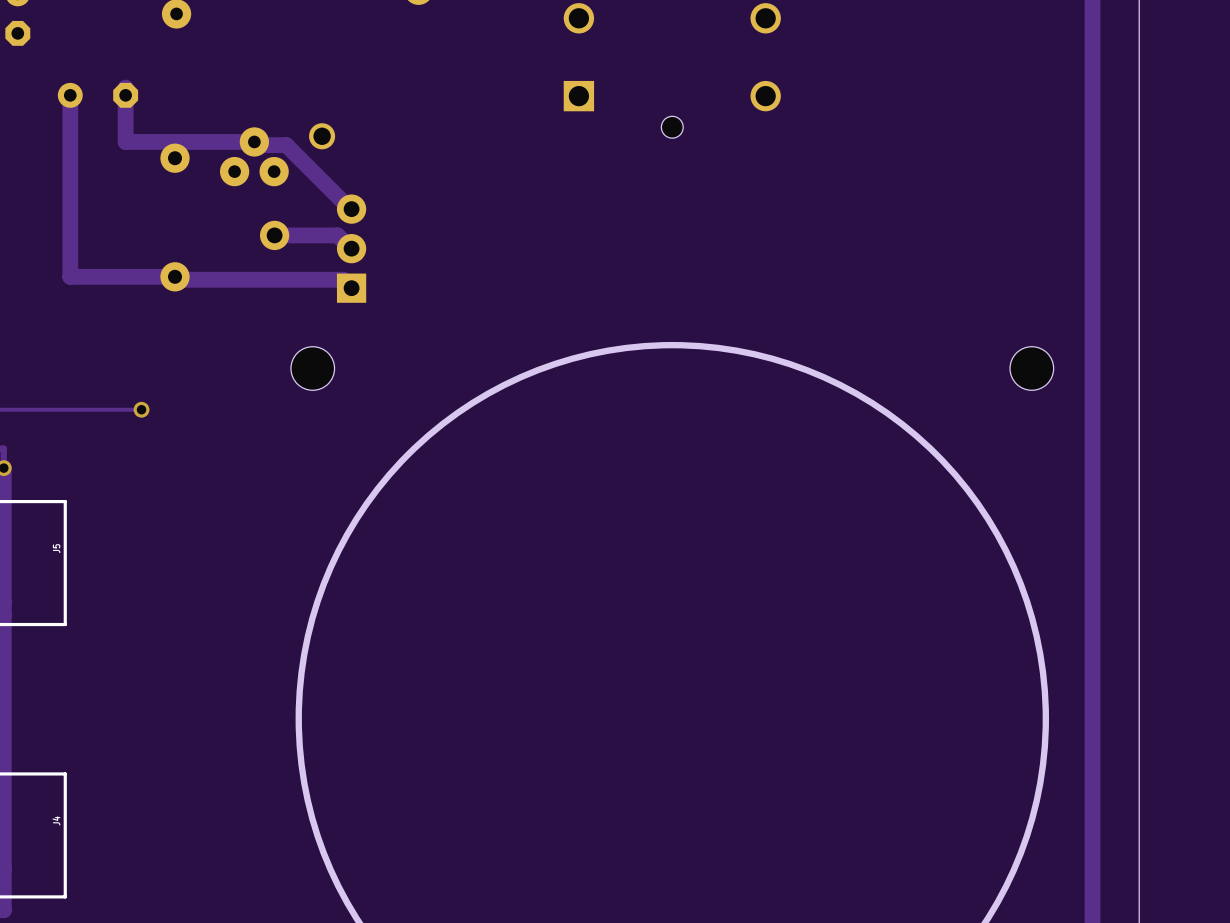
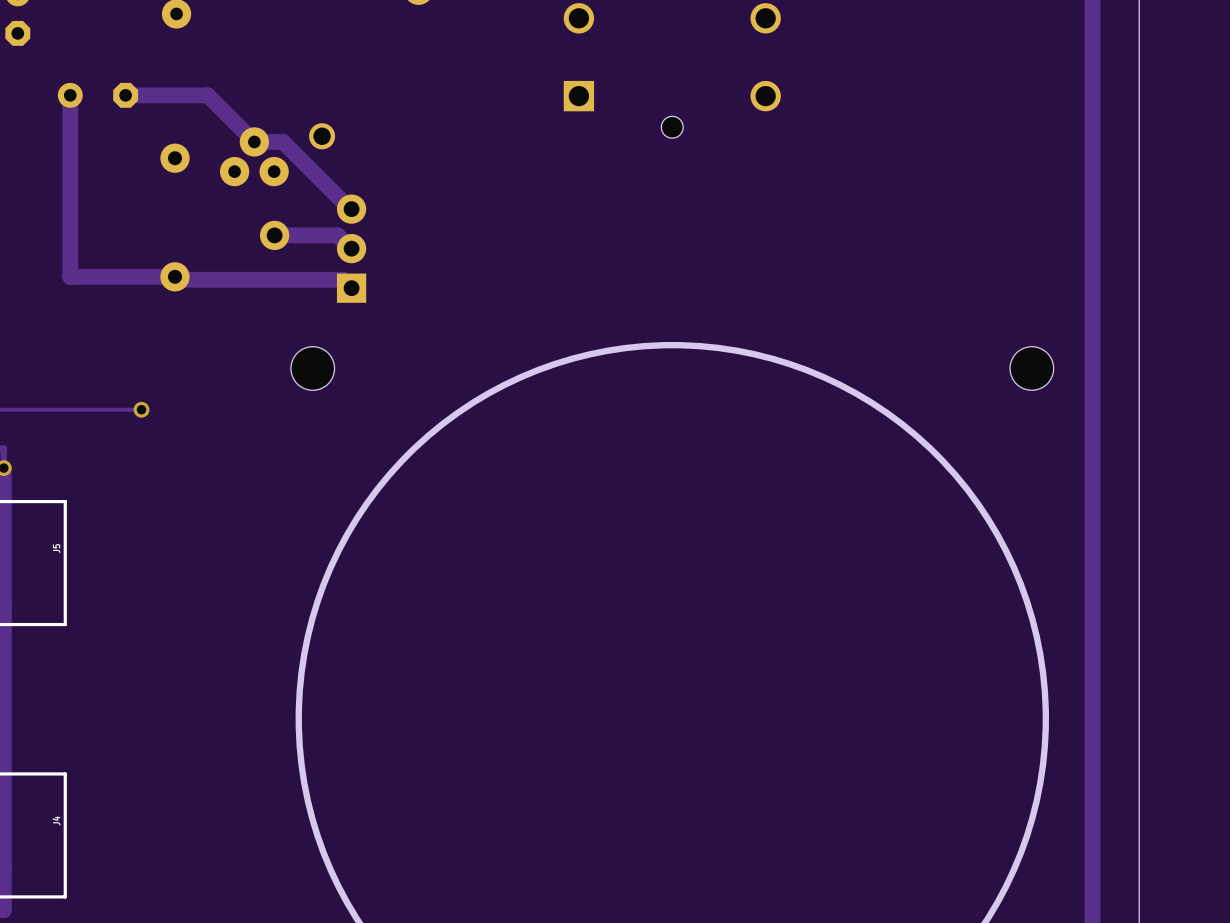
track: (125, 87) (125, 141) (254, 141) (262, 145) (286, 145) -> (125, 95) (207, 95) (254, 141) (283, 141) (286, 145)

